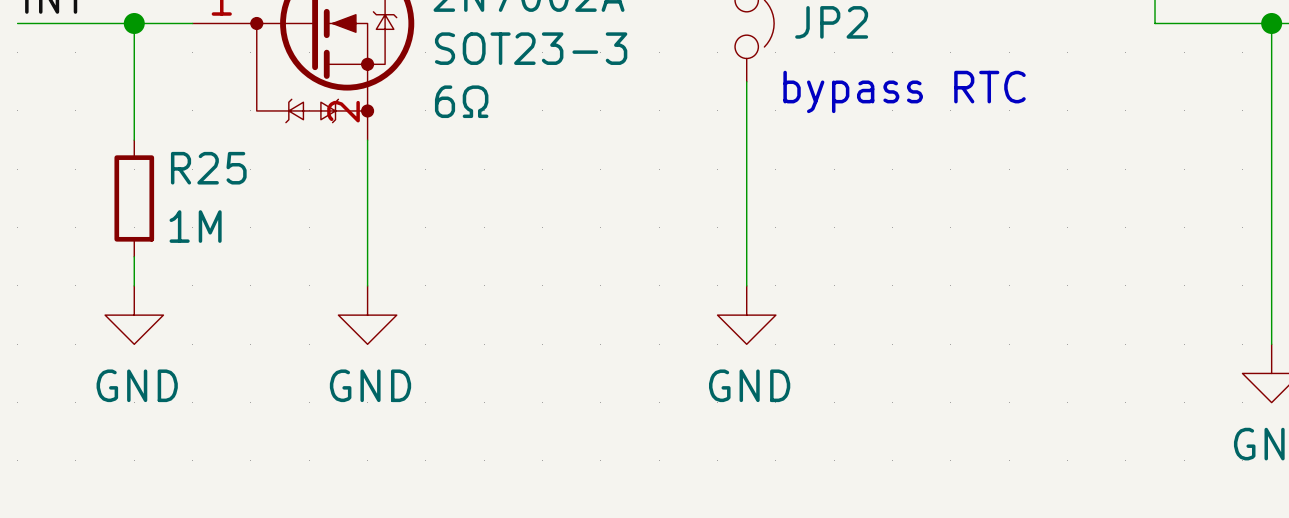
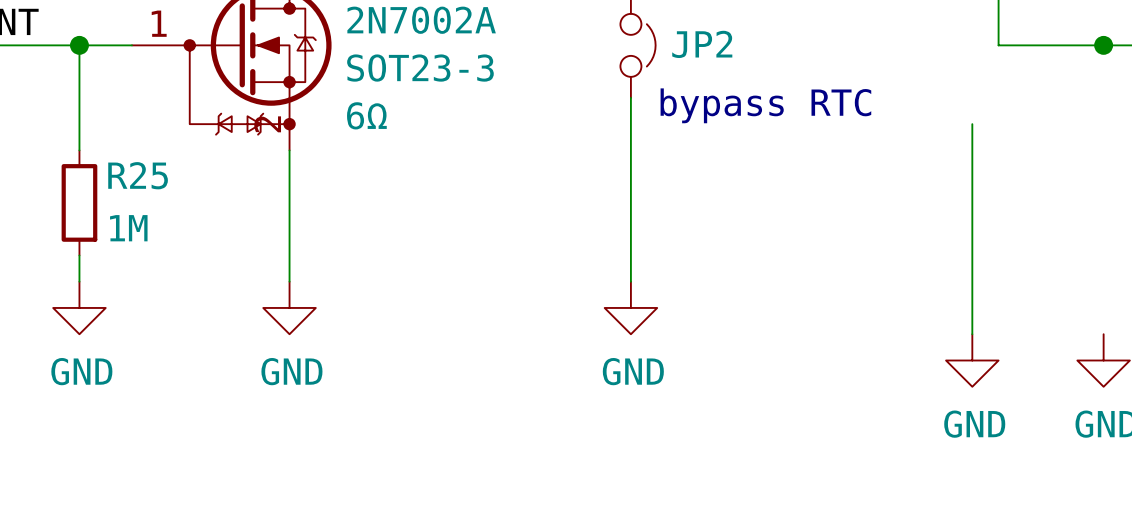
wire: (1271, 23) (1271, 344) -> none
wire: none -> (972, 124) (972, 334)
power symbol: none -> GND (972, 360)

